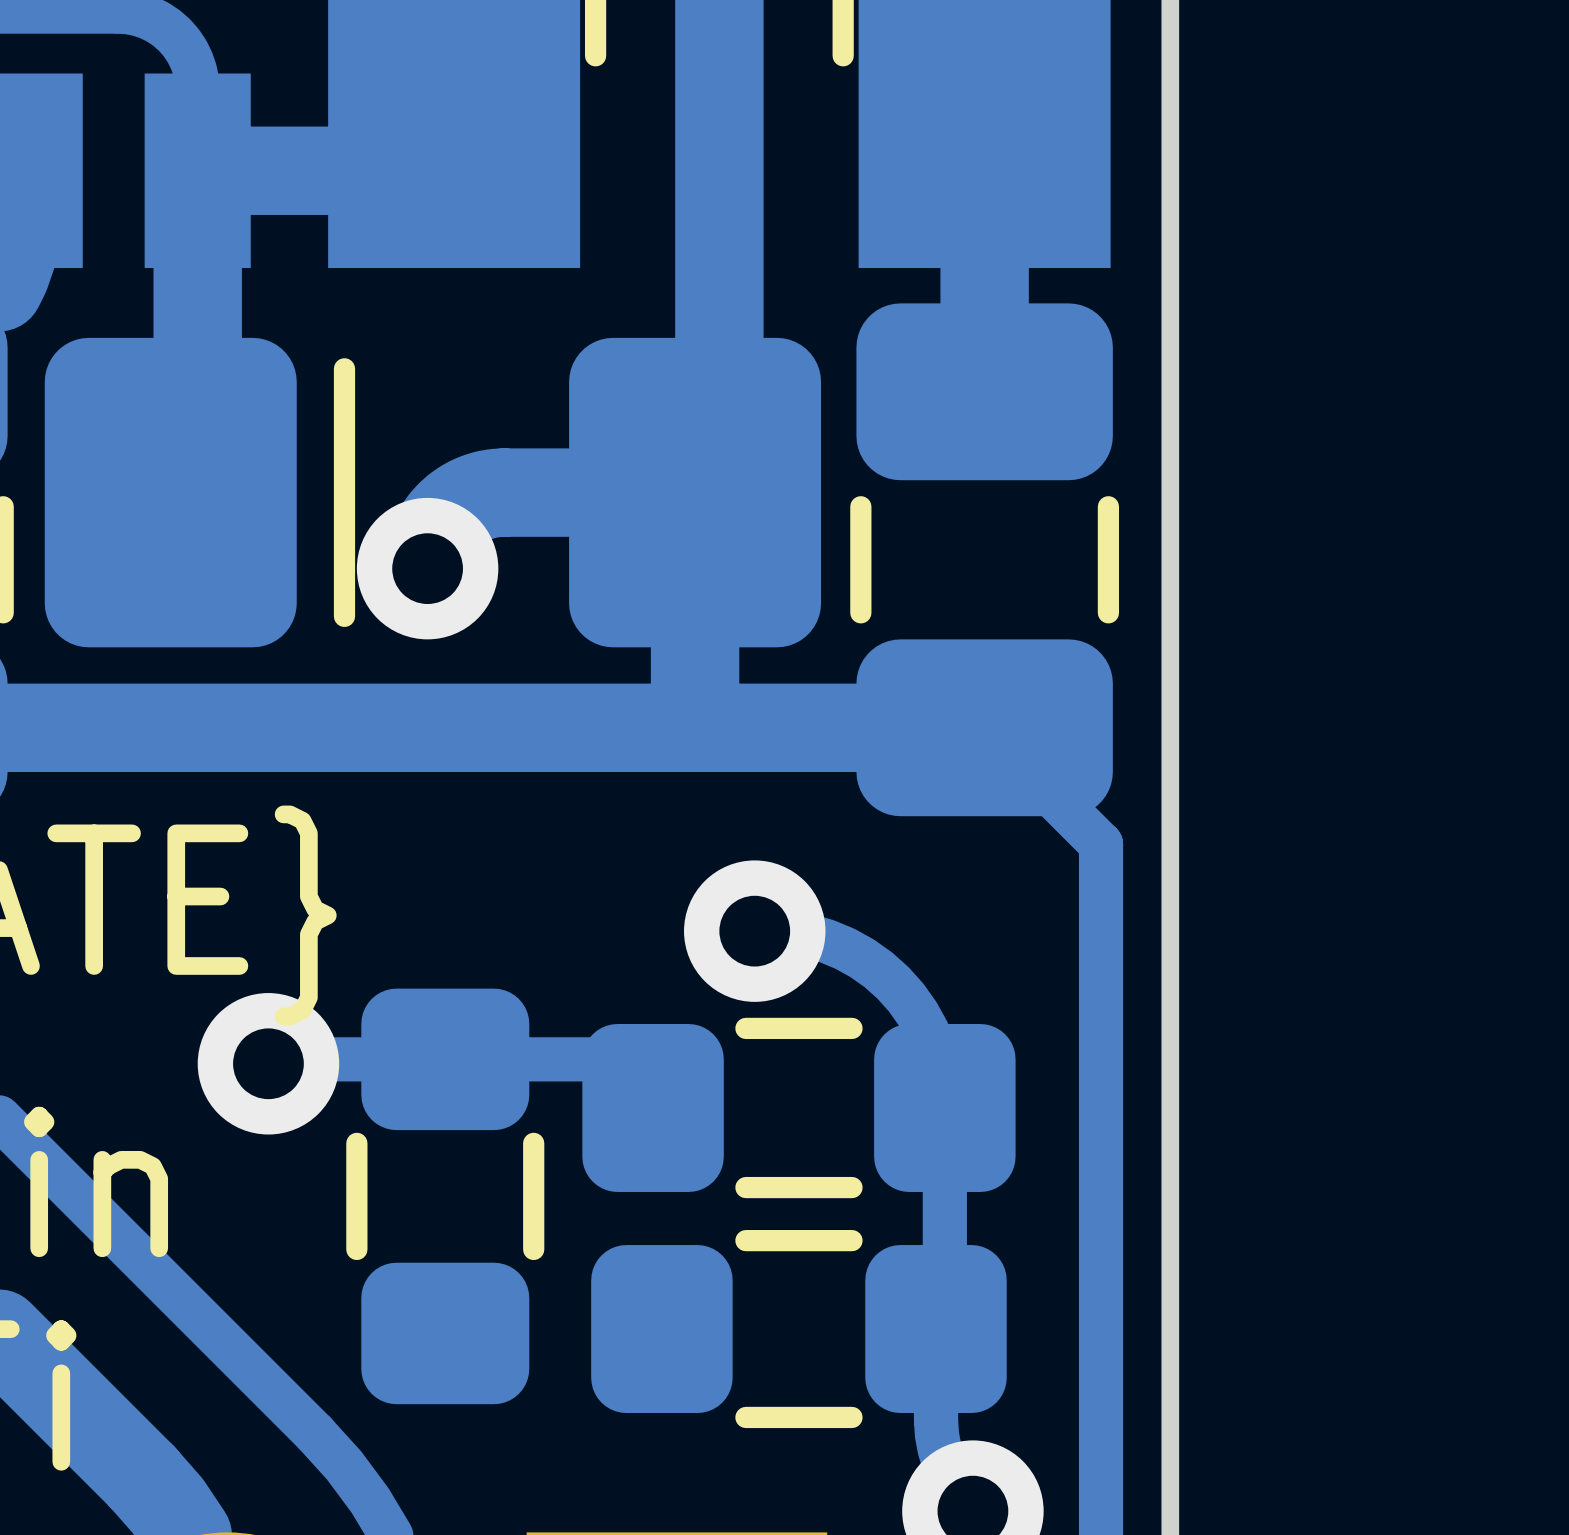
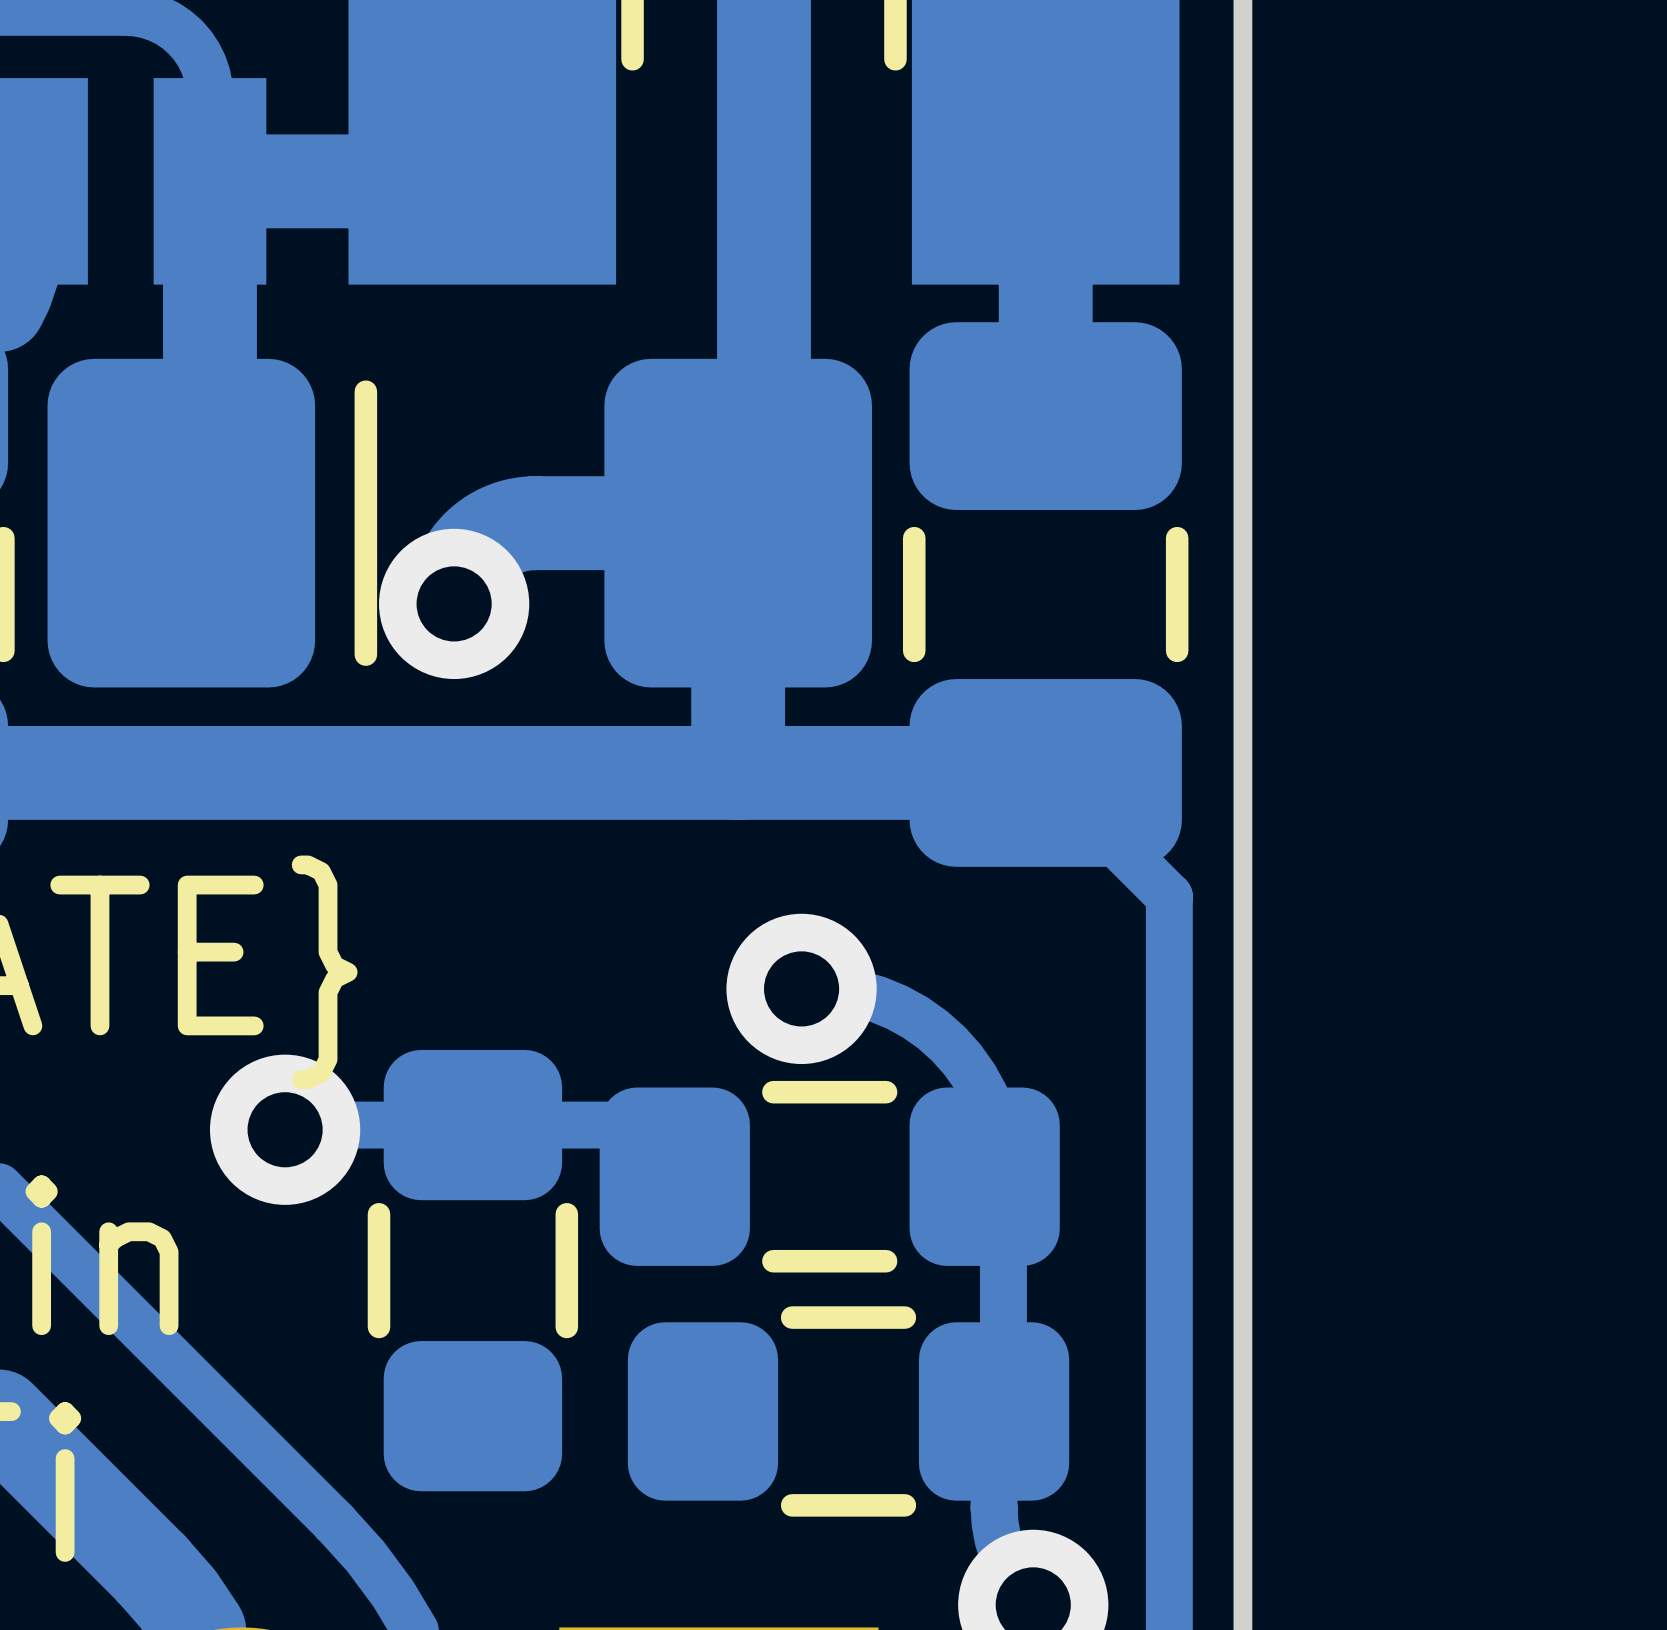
part position: (798, 1107) -> (829, 1176)

